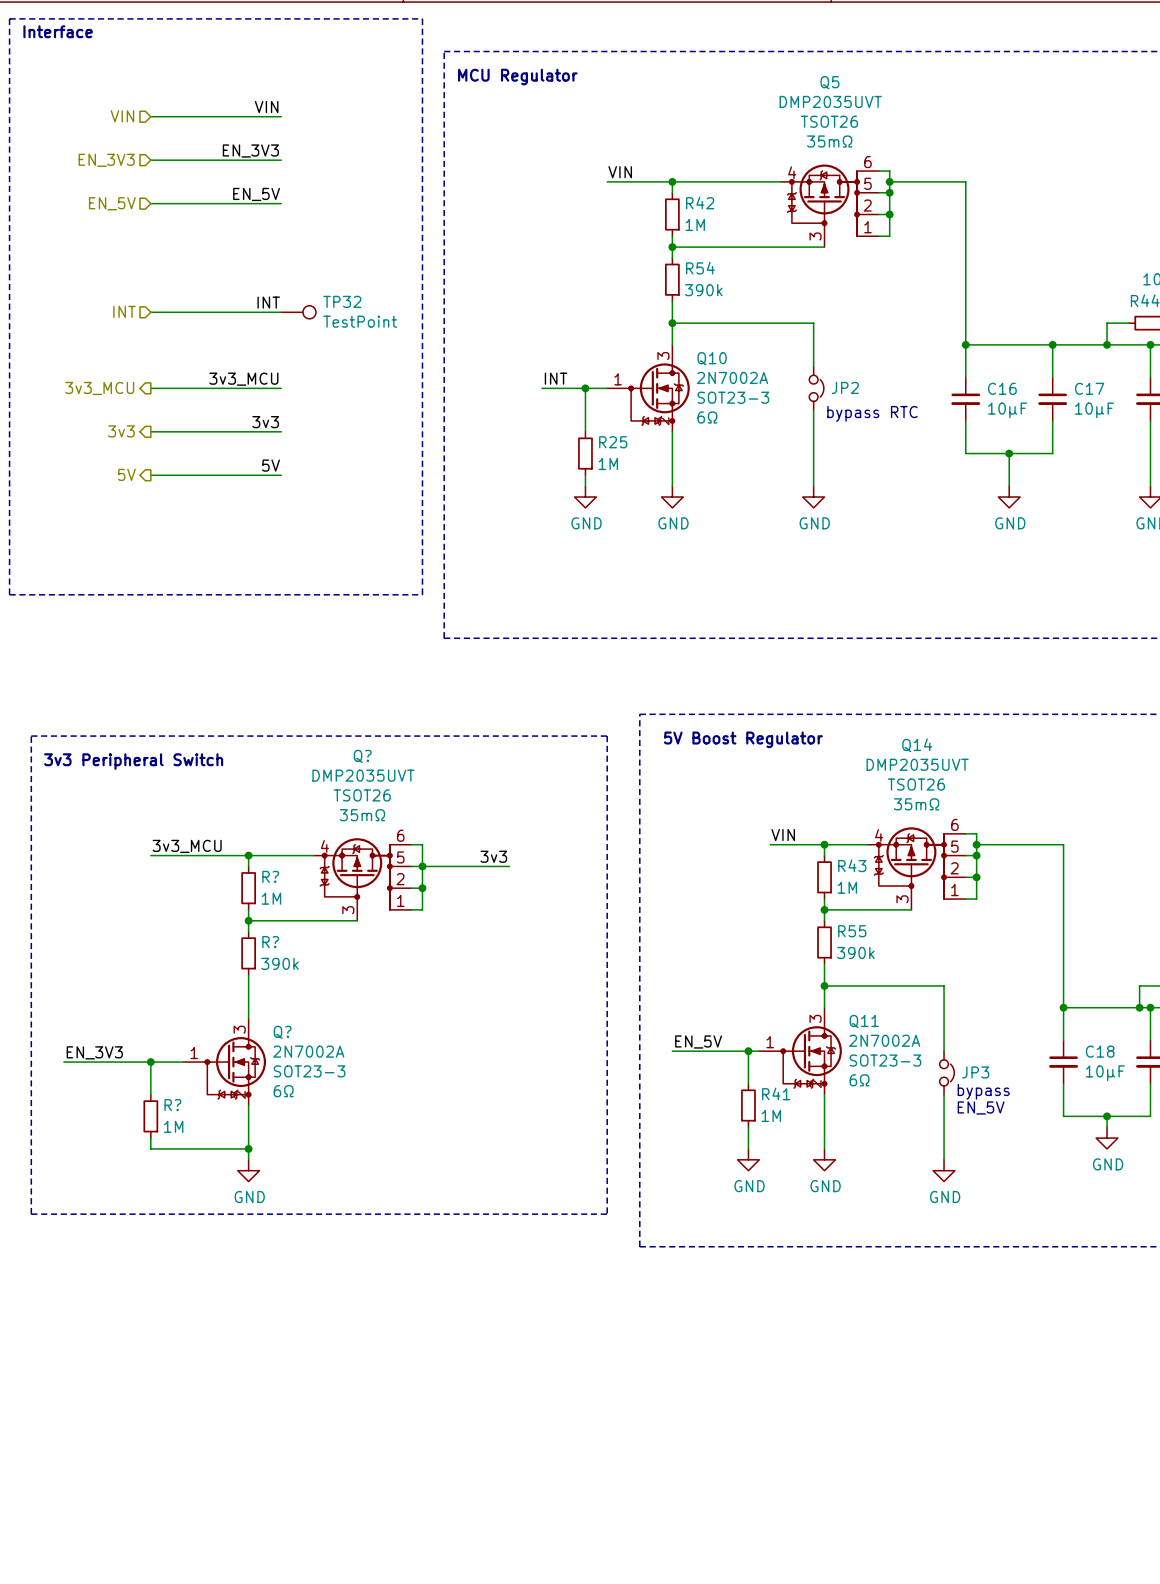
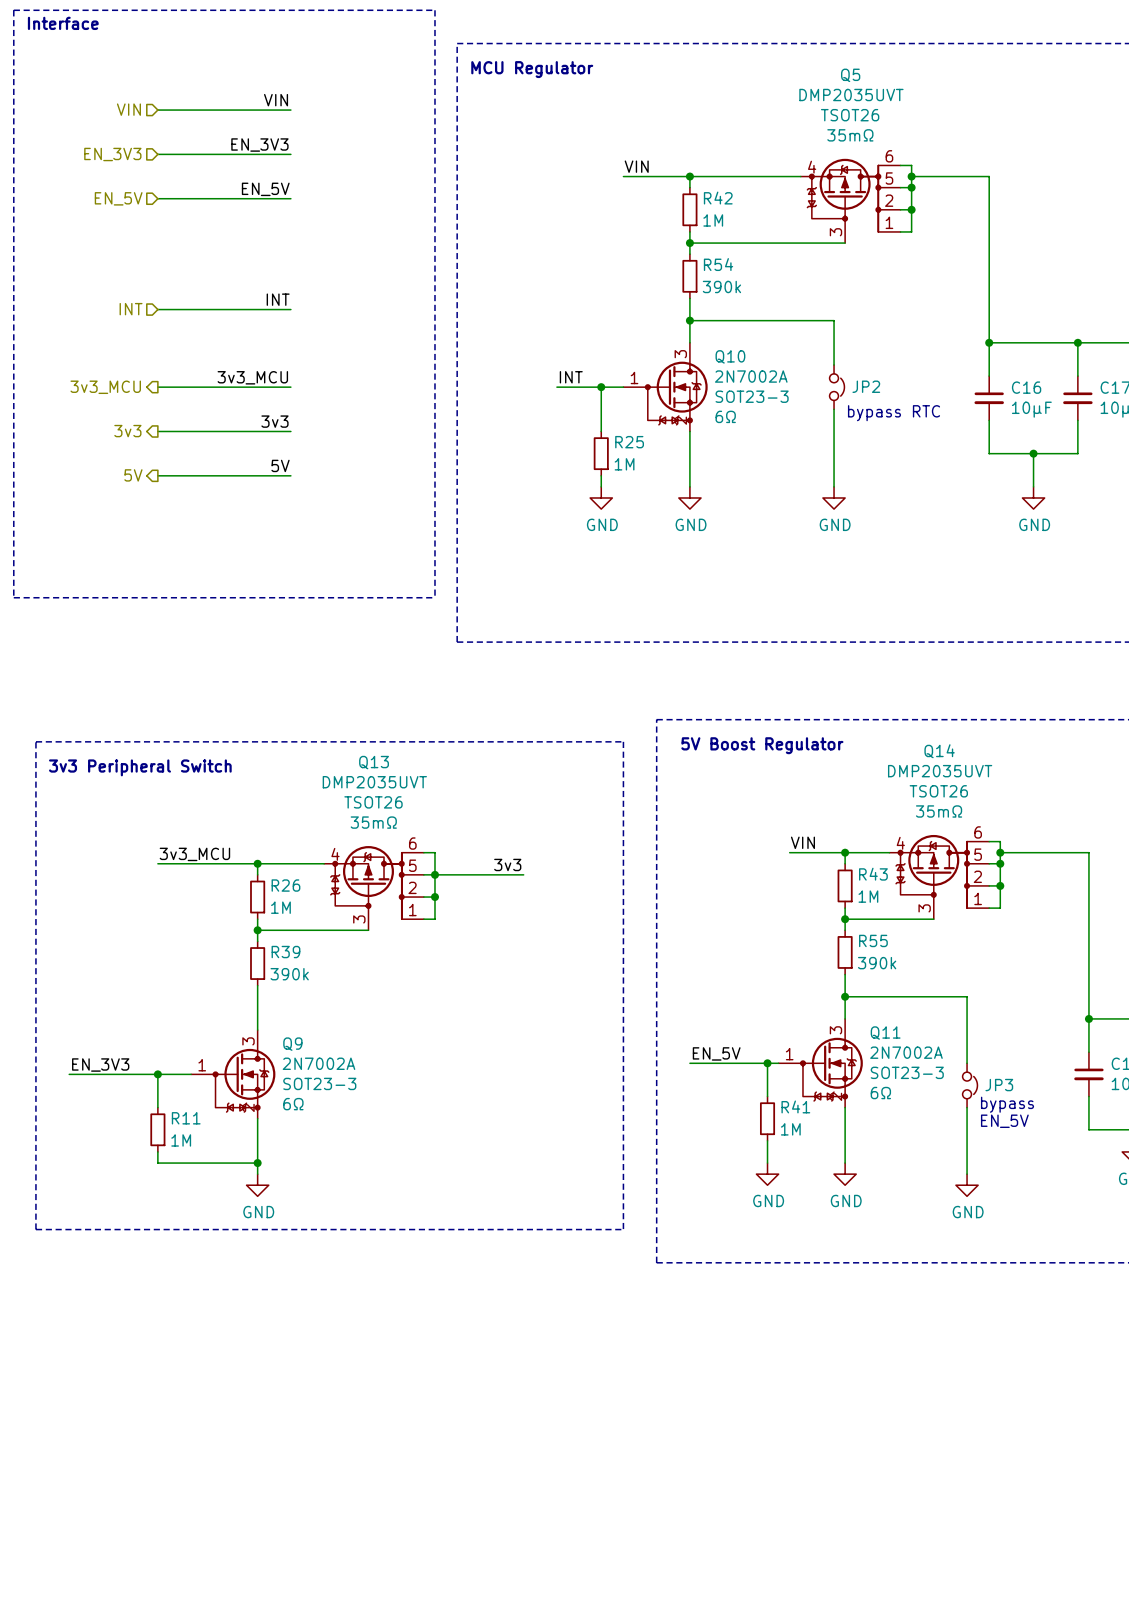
TP32: TestPoint (298, 312) -> none
Q? name: Q? (362, 756) -> Q13 (374, 762)
R? name: R? (270, 876) -> R26 (285, 885)
R? name: R? (270, 942) -> R39 (285, 952)
Q? name: Q? (282, 1032) -> Q9 (292, 1044)
R? name: R? (172, 1105) -> R11 (186, 1118)

